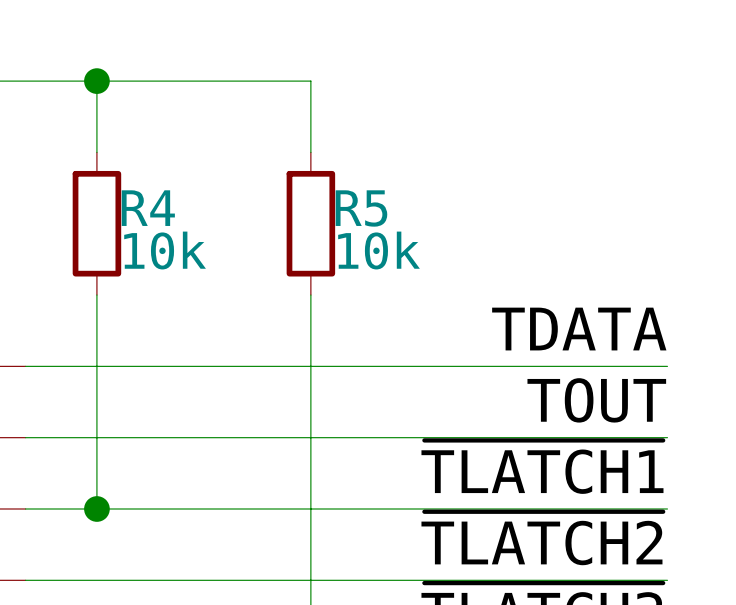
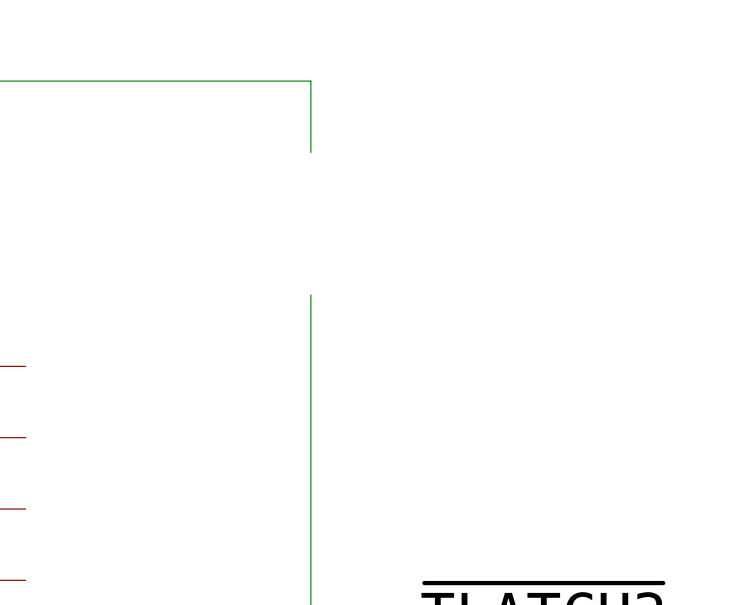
wire: (96, 81) (96, 152) -> none
junction: (96, 81) -> none
R4: 10k (96, 223) -> none
R5: 10k (310, 223) -> none
wire: (96, 295) (96, 508) -> none
label: TDATA (579, 329) -> none
wire: (25, 366) (667, 366) -> none
label: TOUT (596, 400) -> none
wire: (25, 437) (667, 437) -> none
label: ~{TLATCH1} (542, 467) -> none
wire: (25, 508) (667, 508) -> none
junction: (96, 508) -> none
label: ~{TLATCH2} (542, 538) -> none
wire: (25, 580) (667, 580) -> none

